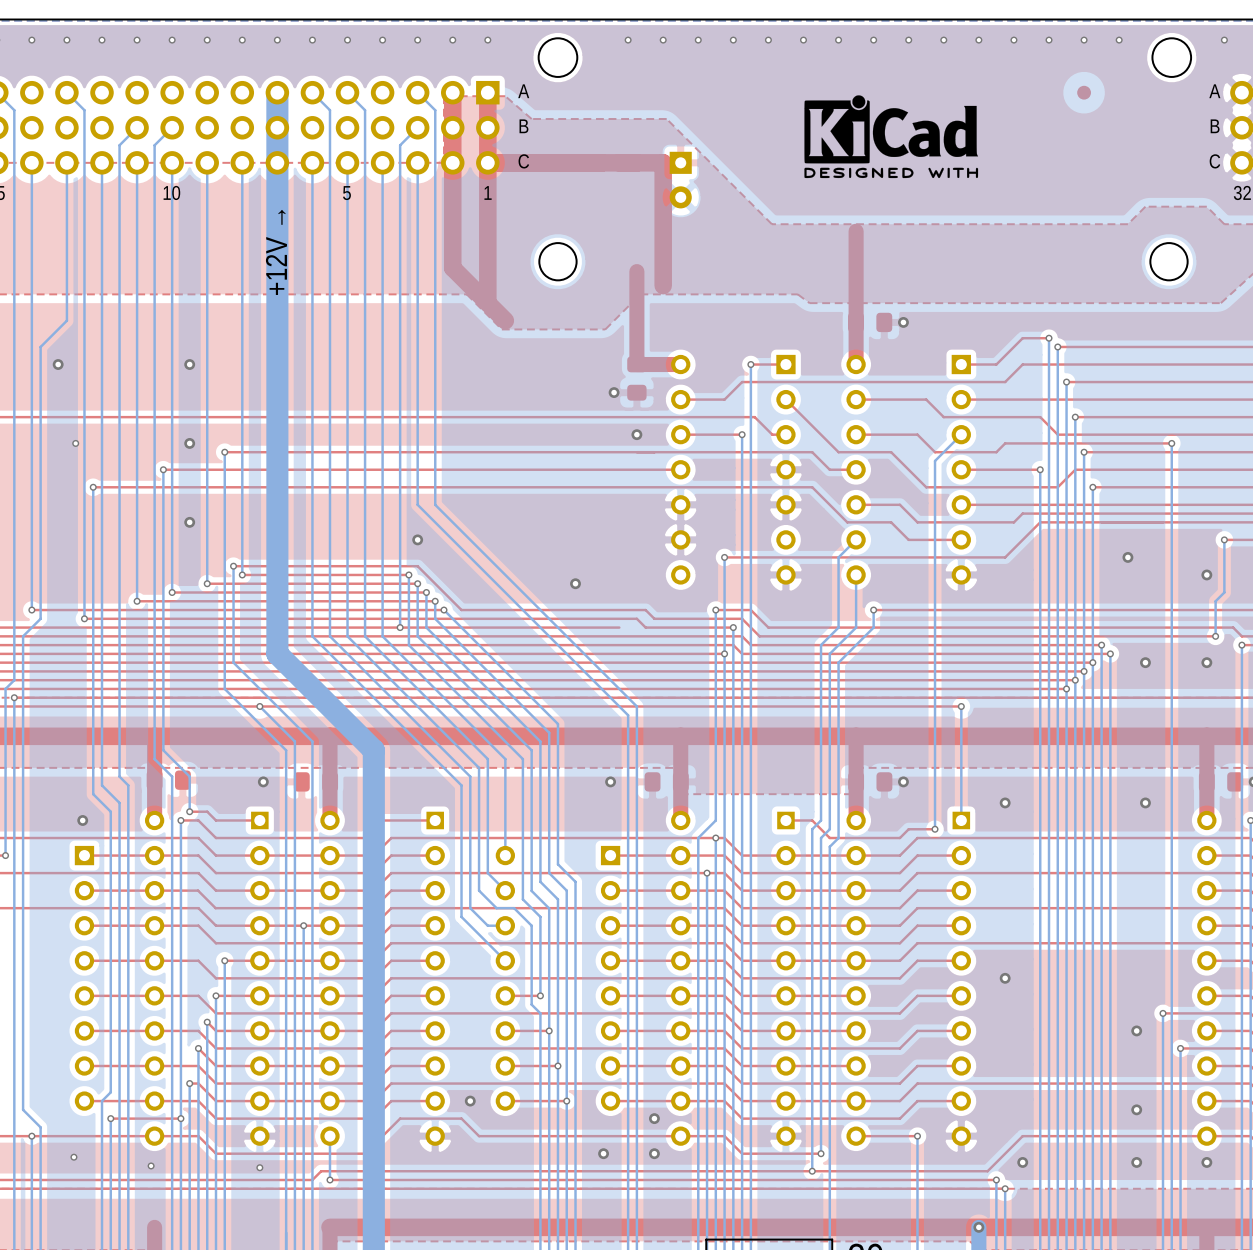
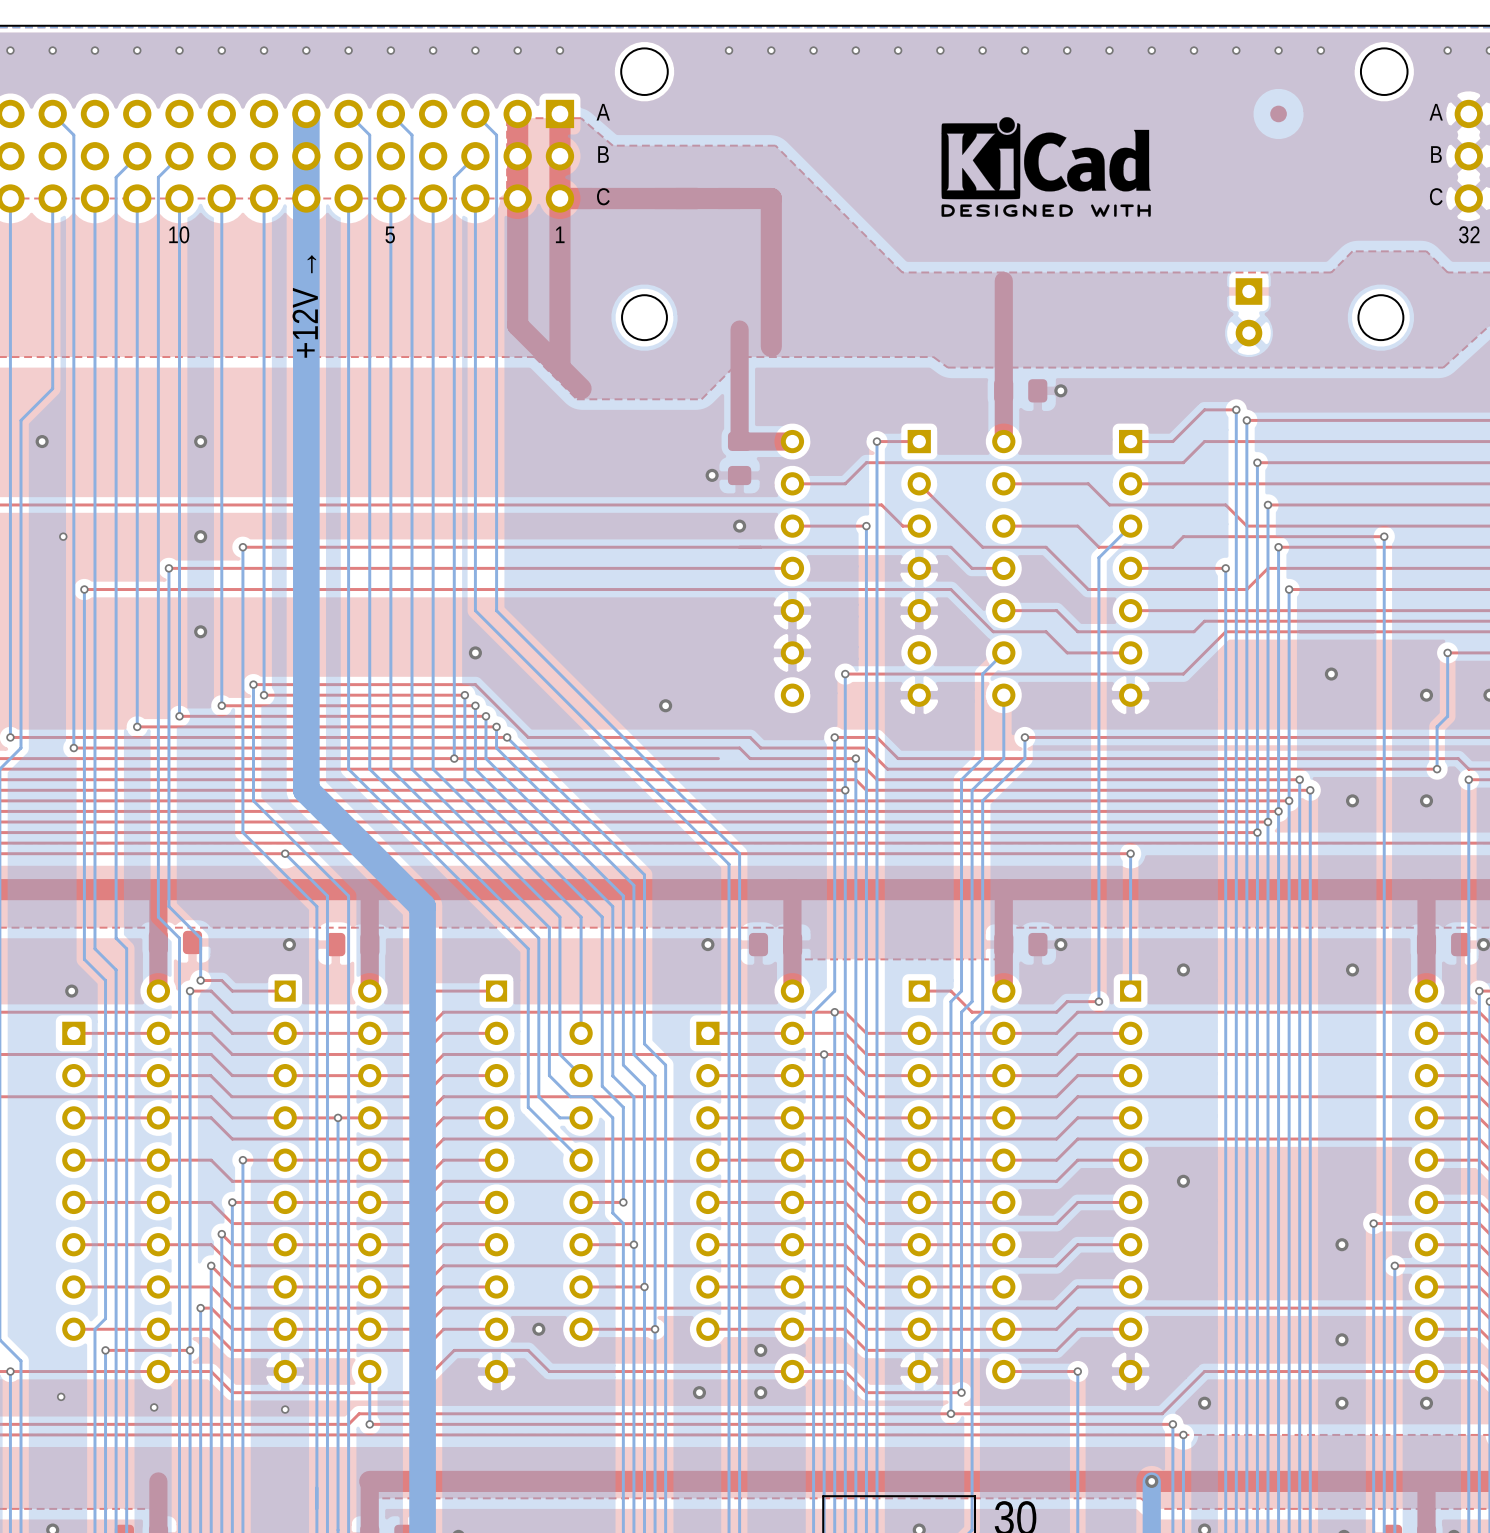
part: (680, 180) -> none
part: none -> (1248, 312)

